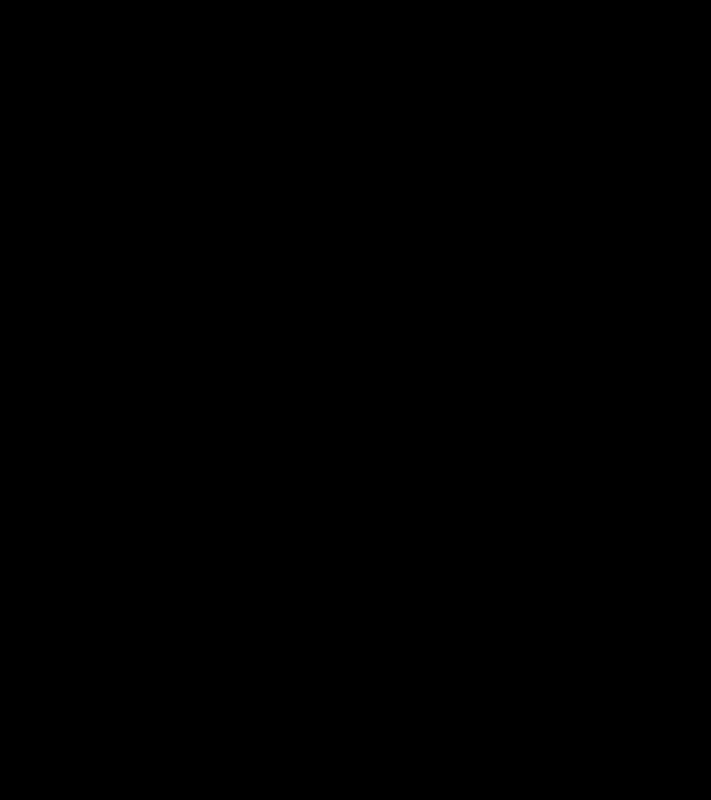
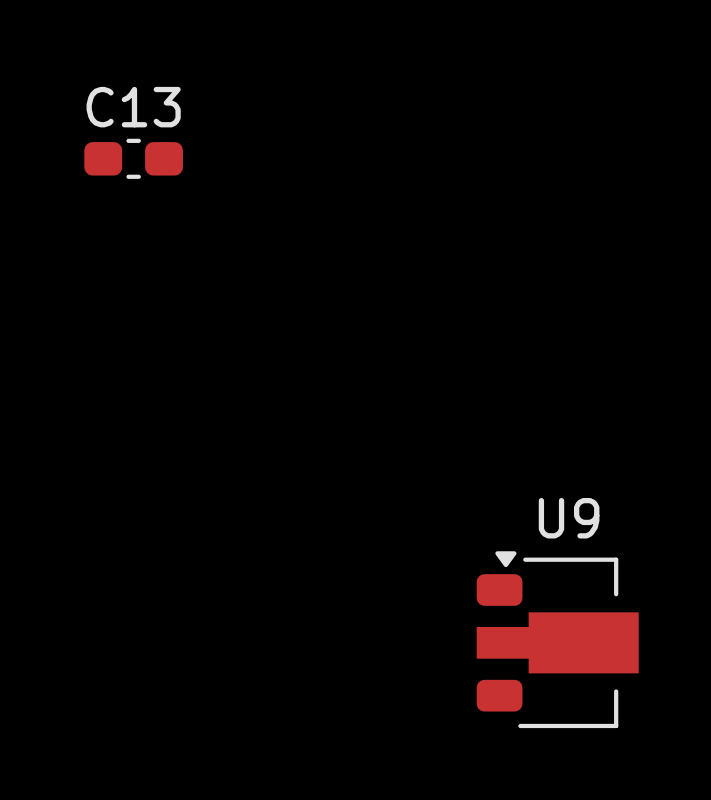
C13: none -> (133, 158)
U9: none -> (557, 639)

